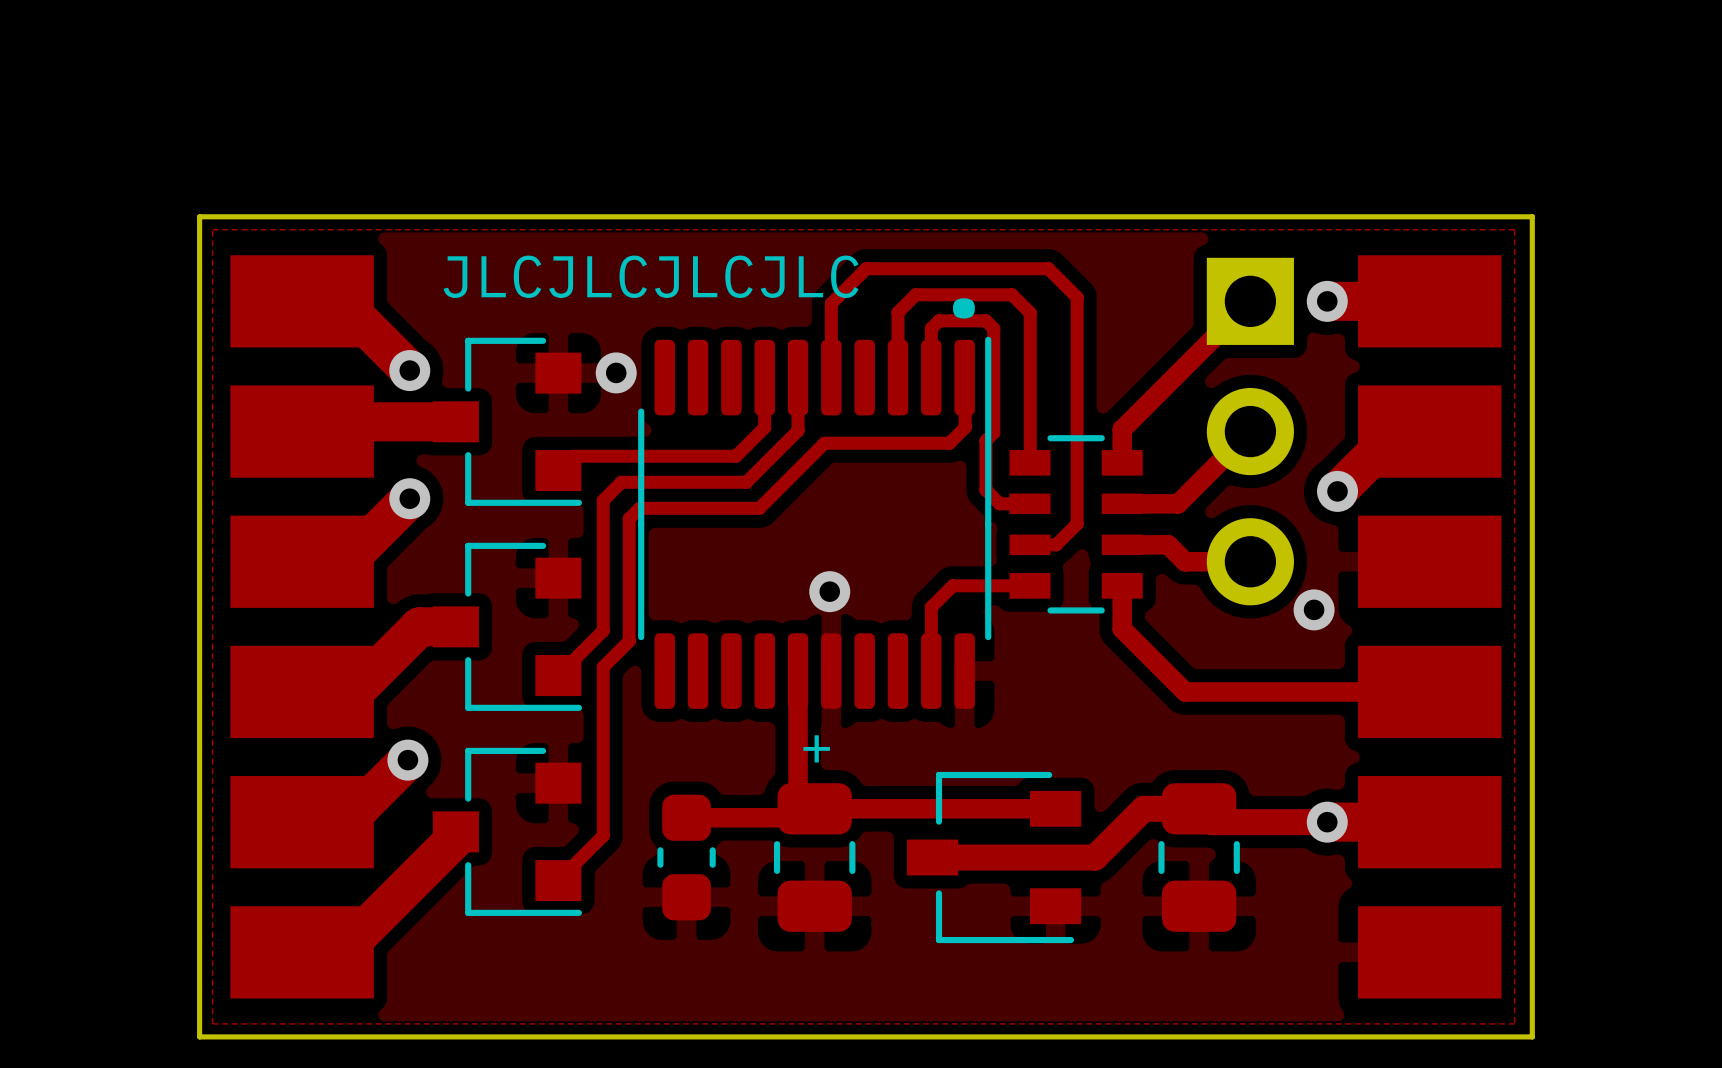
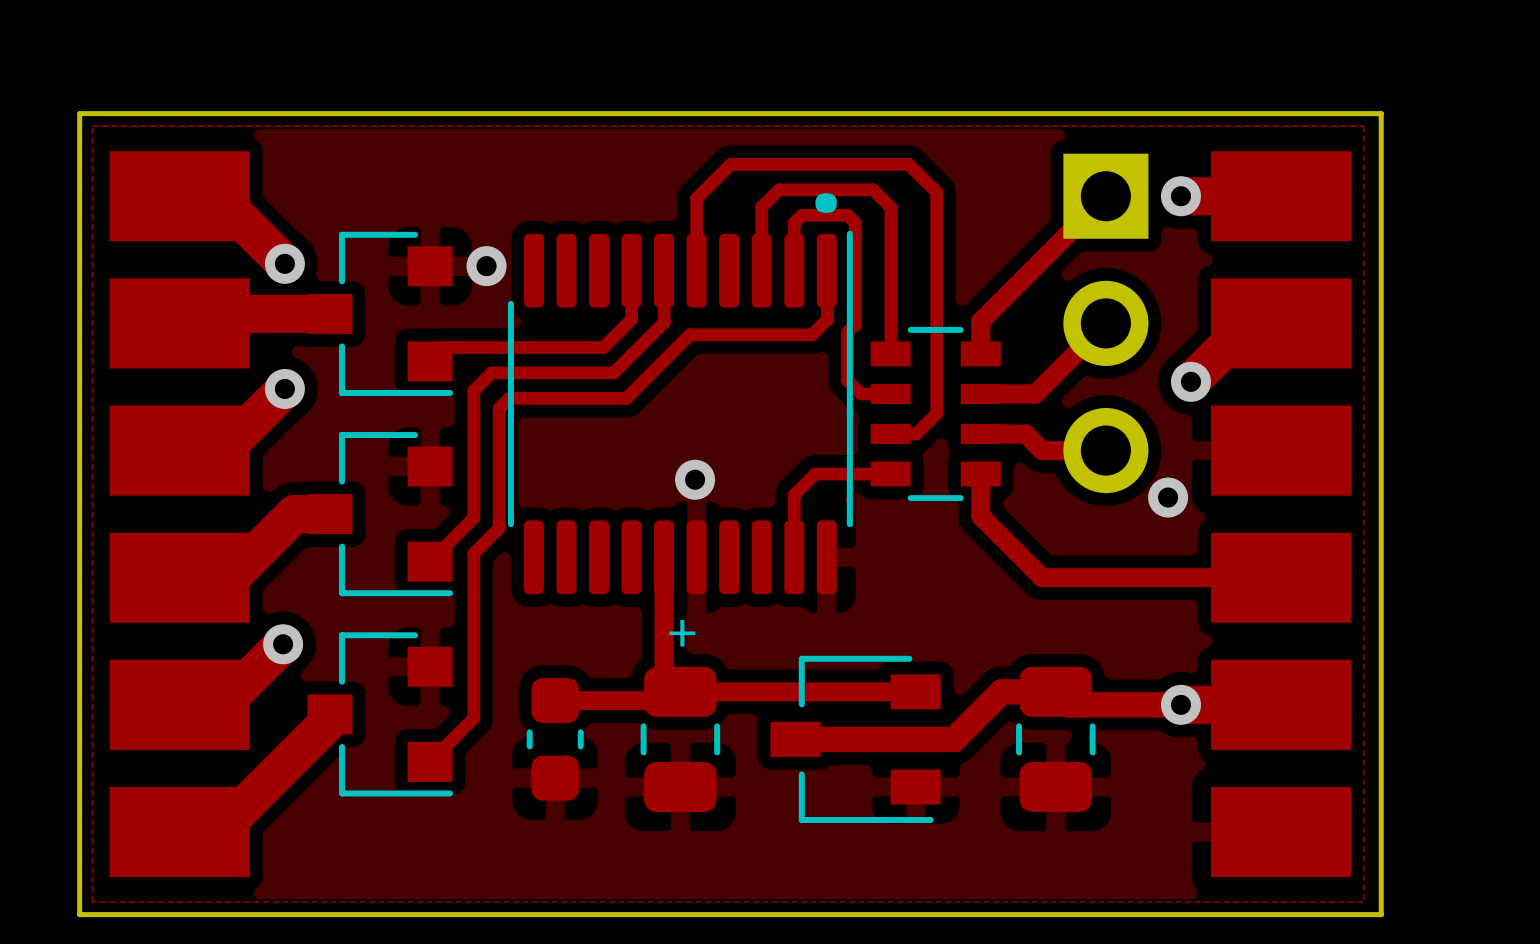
text: JLCJLCJLCJLC (651, 276) -> none

